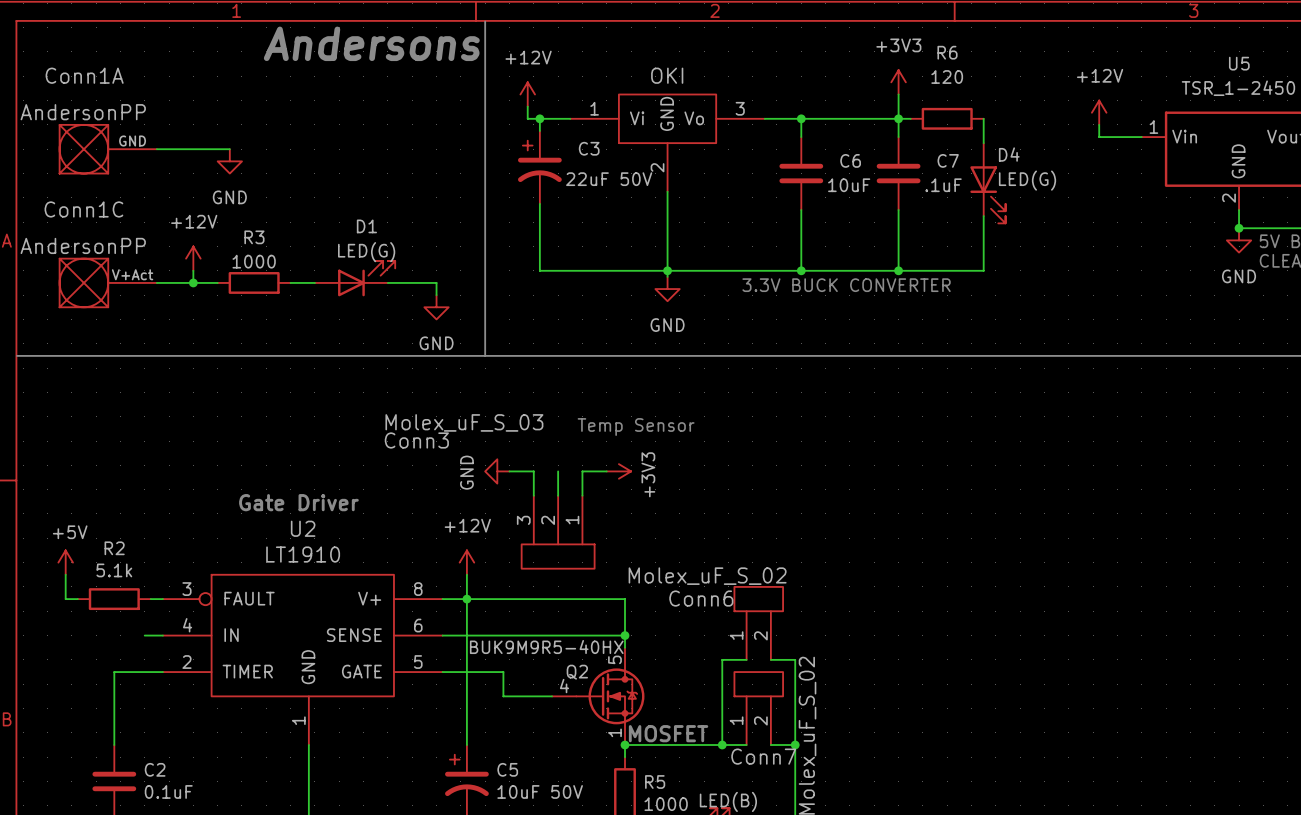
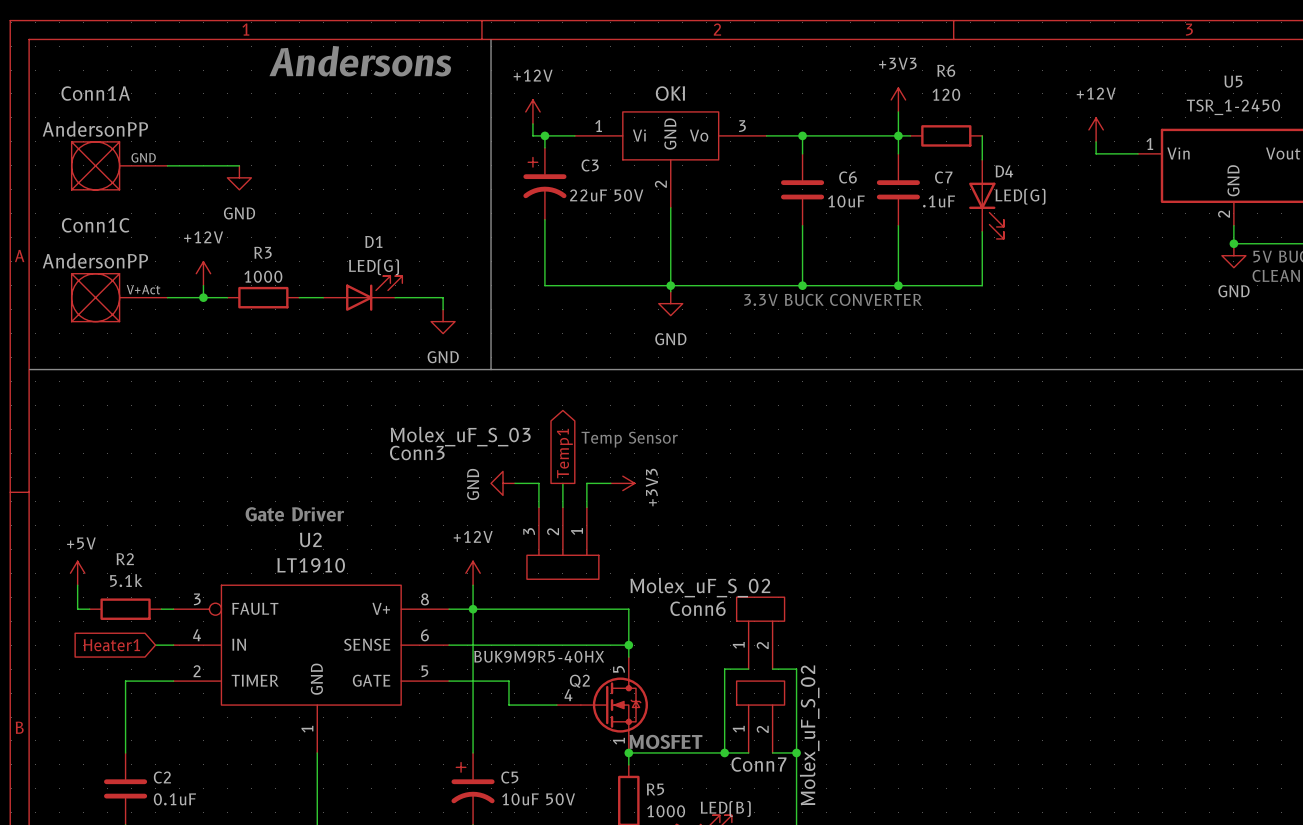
global label: none -> Temp1 (564, 453)
global label: none -> Heater1 (111, 645)

